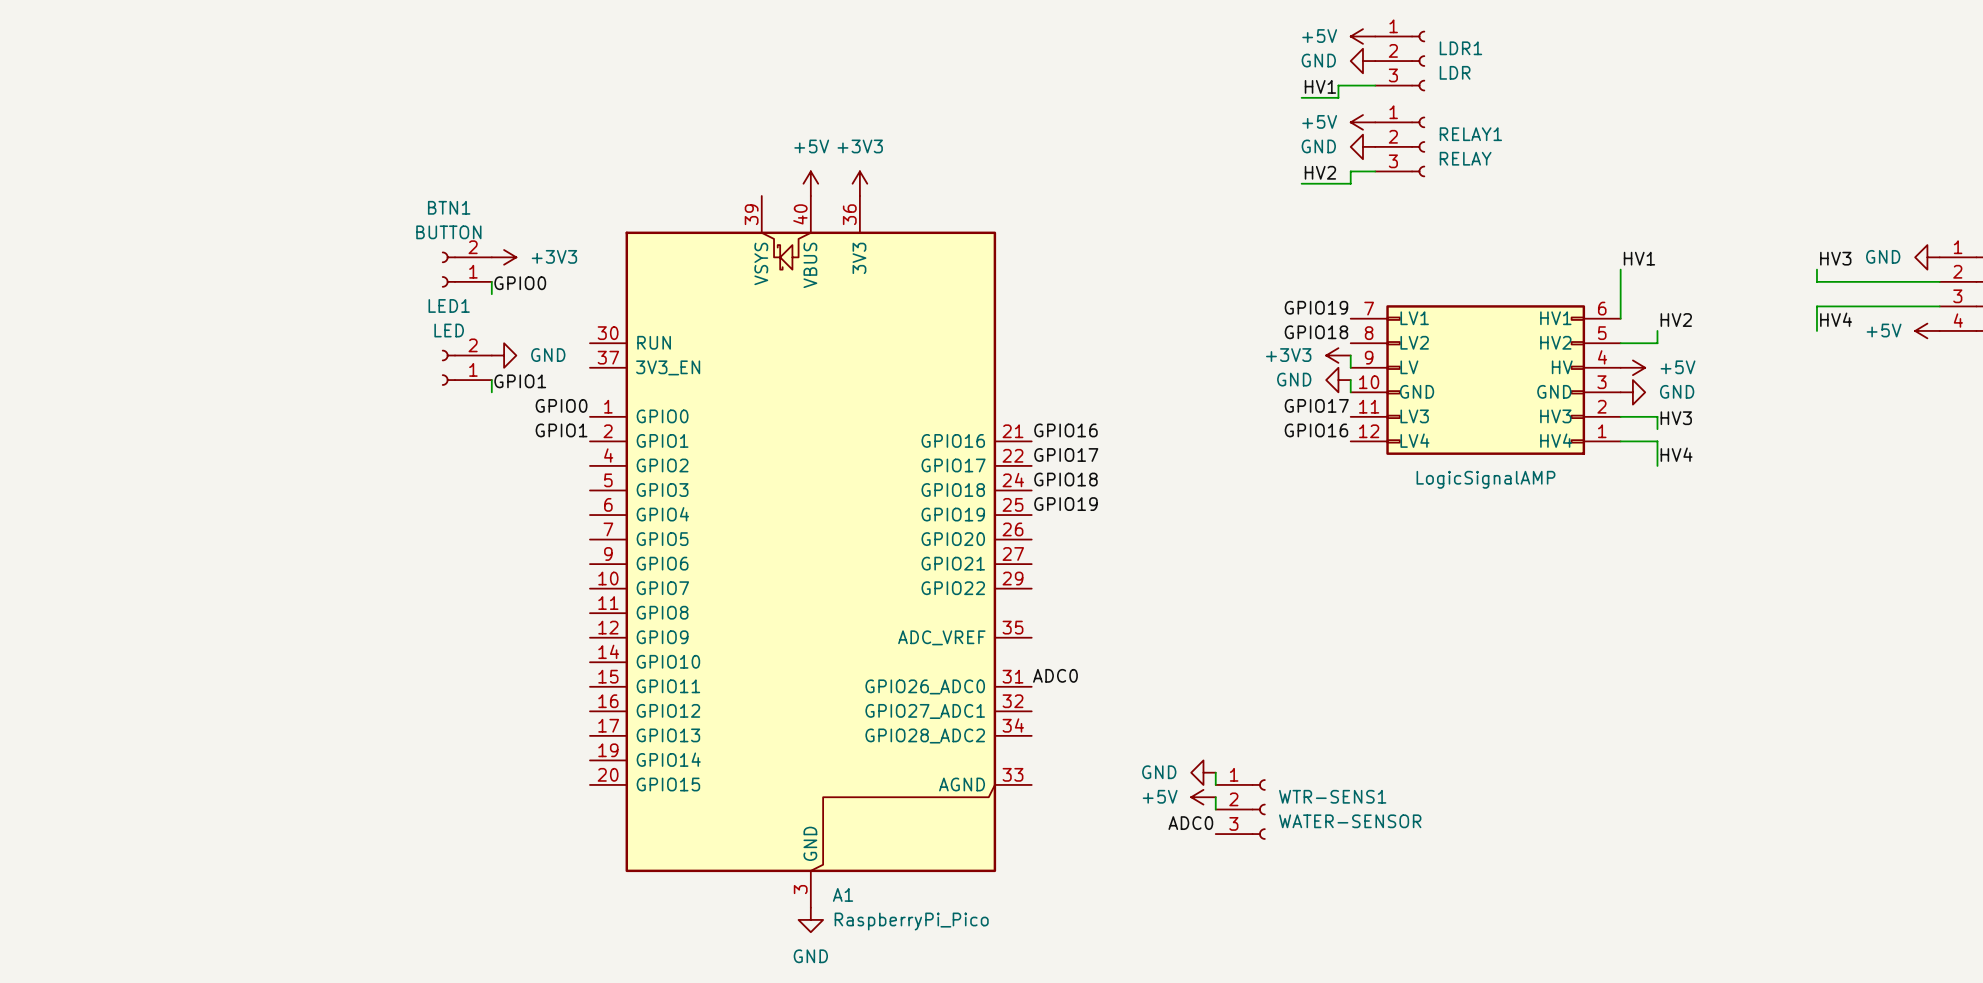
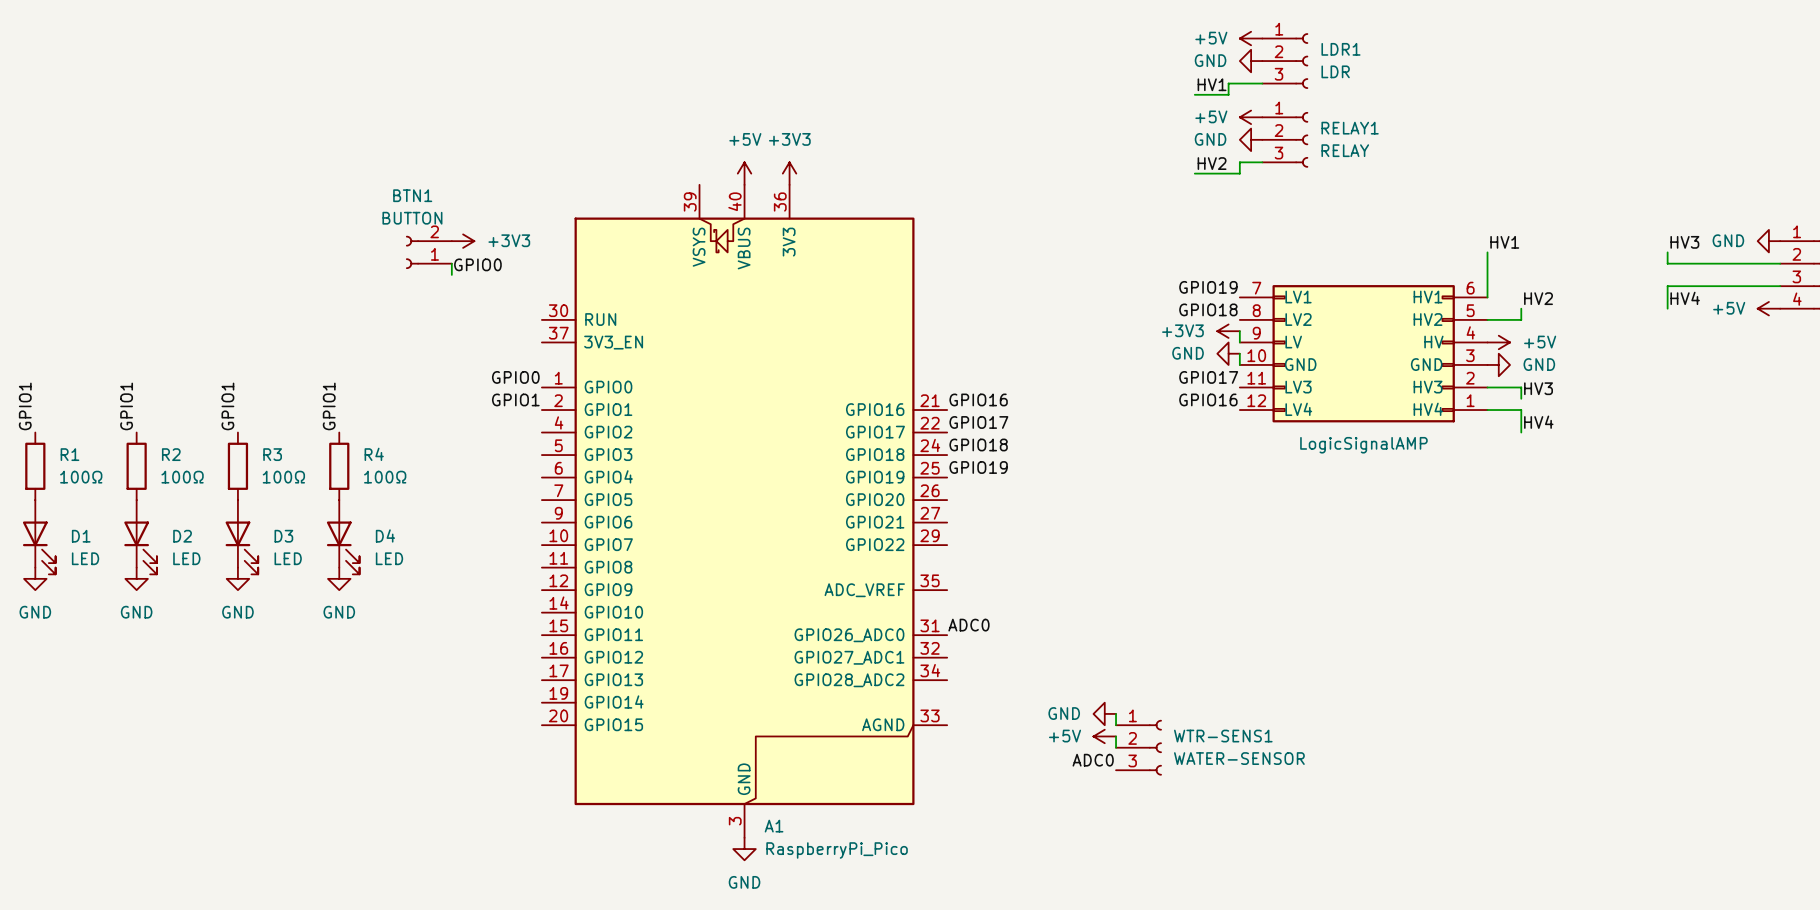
power symbol: GND (504, 355) -> none
LED1: LED (466, 367) -> none
wire: (491, 380) (491, 392) -> none
label: GPIO1 (520, 381) -> none
label: none -> GPIO1 (25, 406)
label: none -> GPIO1 (126, 406)
label: none -> GPIO1 (227, 406)
label: none -> GPIO1 (329, 406)
R1: none -> 100Ω (35, 466)
R2: none -> 100Ω (136, 466)
R3: none -> 100Ω (237, 466)
R4: none -> 100Ω (339, 466)
D1: none -> LED (39, 537)
D2: none -> LED (140, 537)
D3: none -> LED (241, 537)
D4: none -> LED (343, 537)
power symbol: none -> GND (35, 578)
power symbol: none -> GND (136, 578)
power symbol: none -> GND (237, 578)
power symbol: none -> GND (339, 578)

